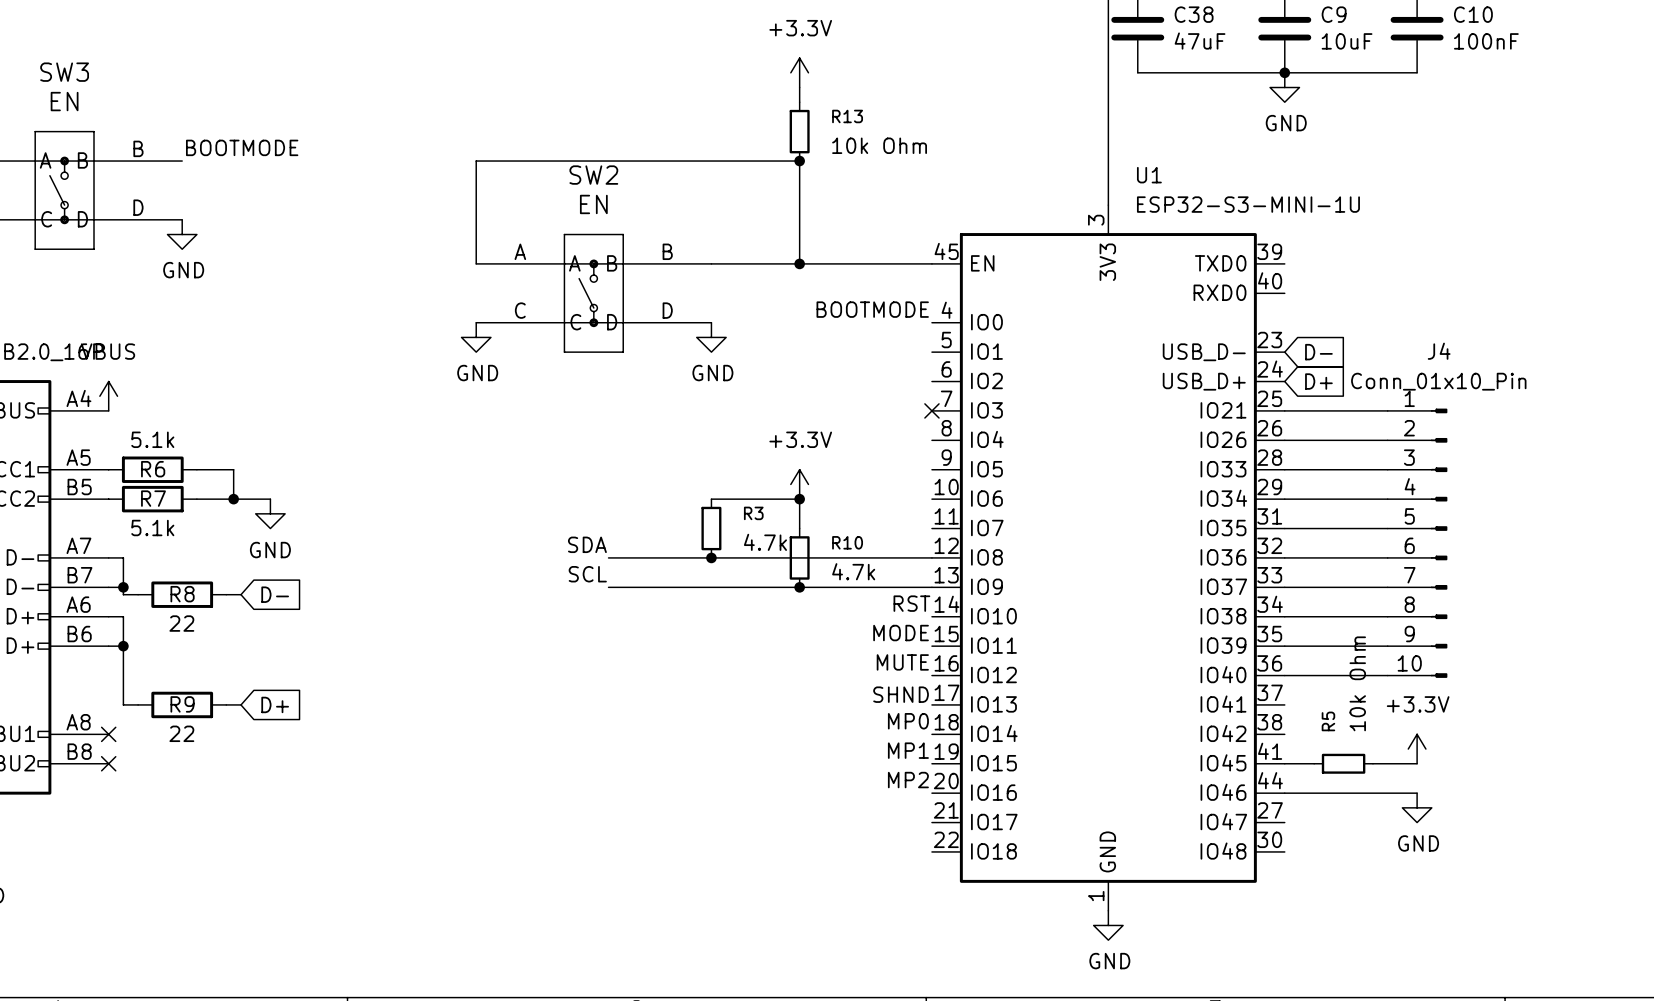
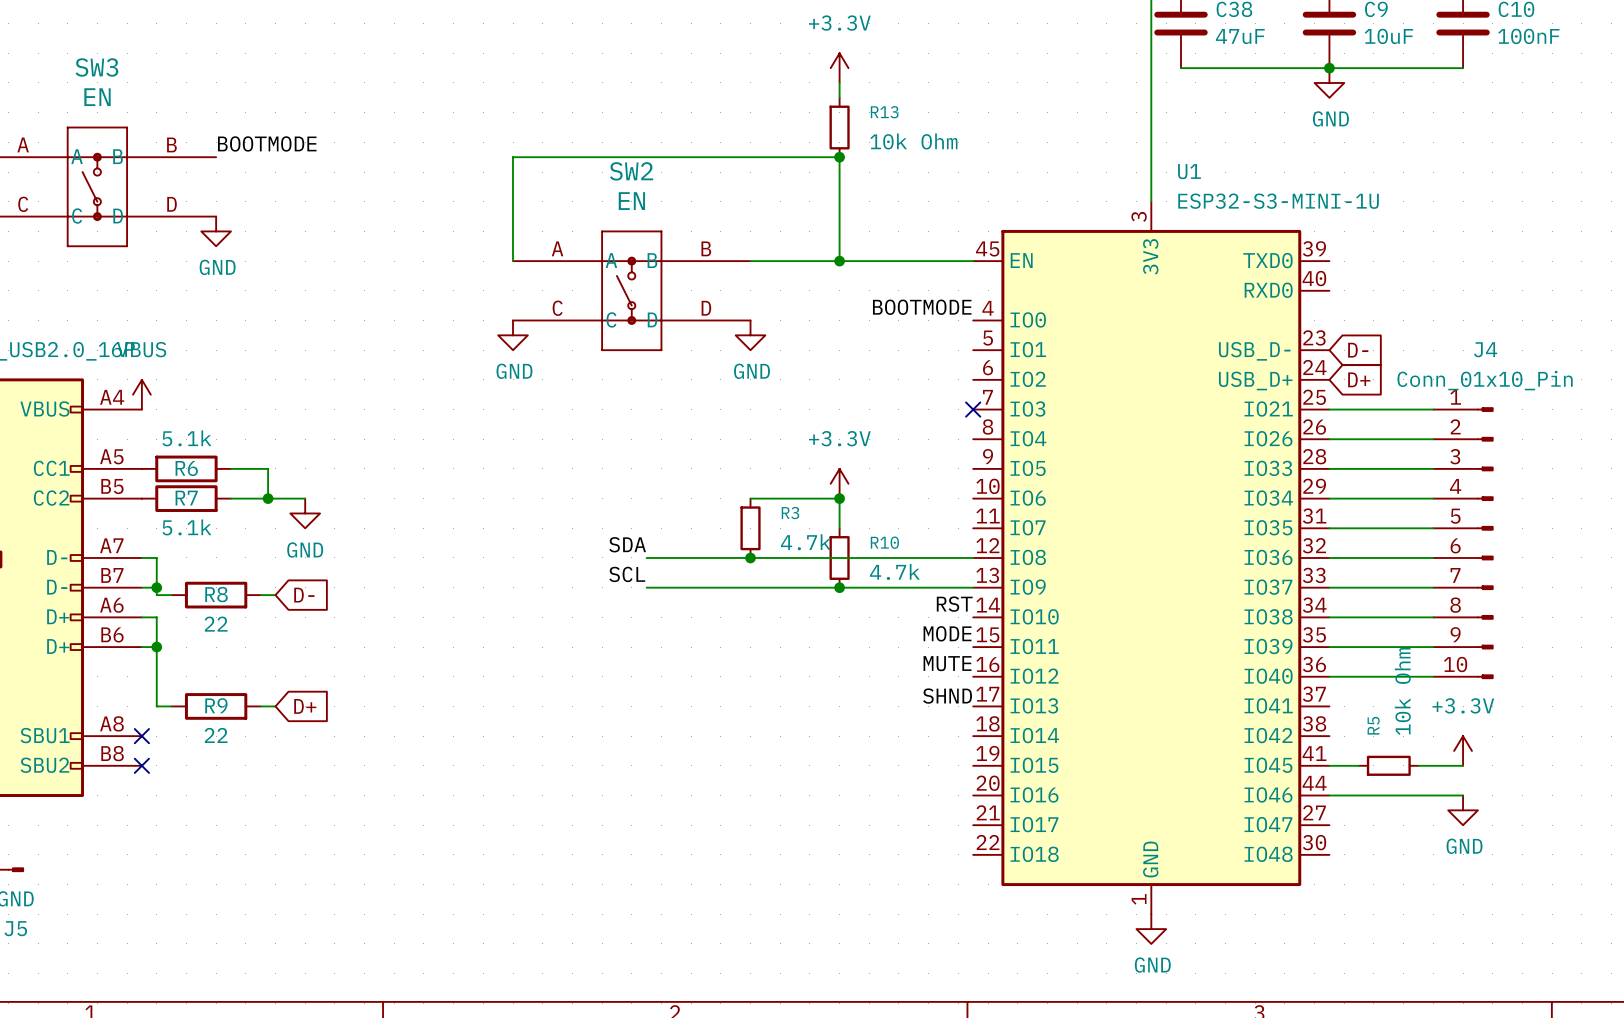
label: MP0 (908, 721) -> none
label: MP1 (908, 750) -> none
label: MP2 (908, 780) -> none

